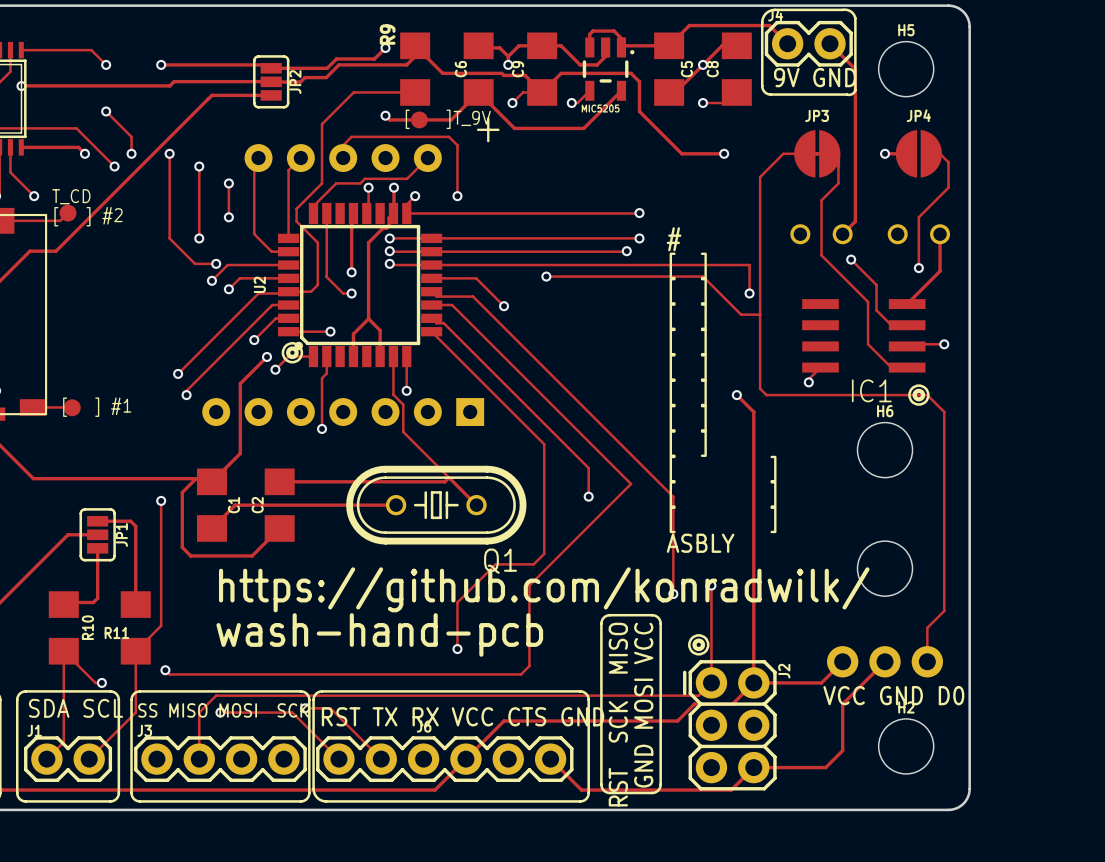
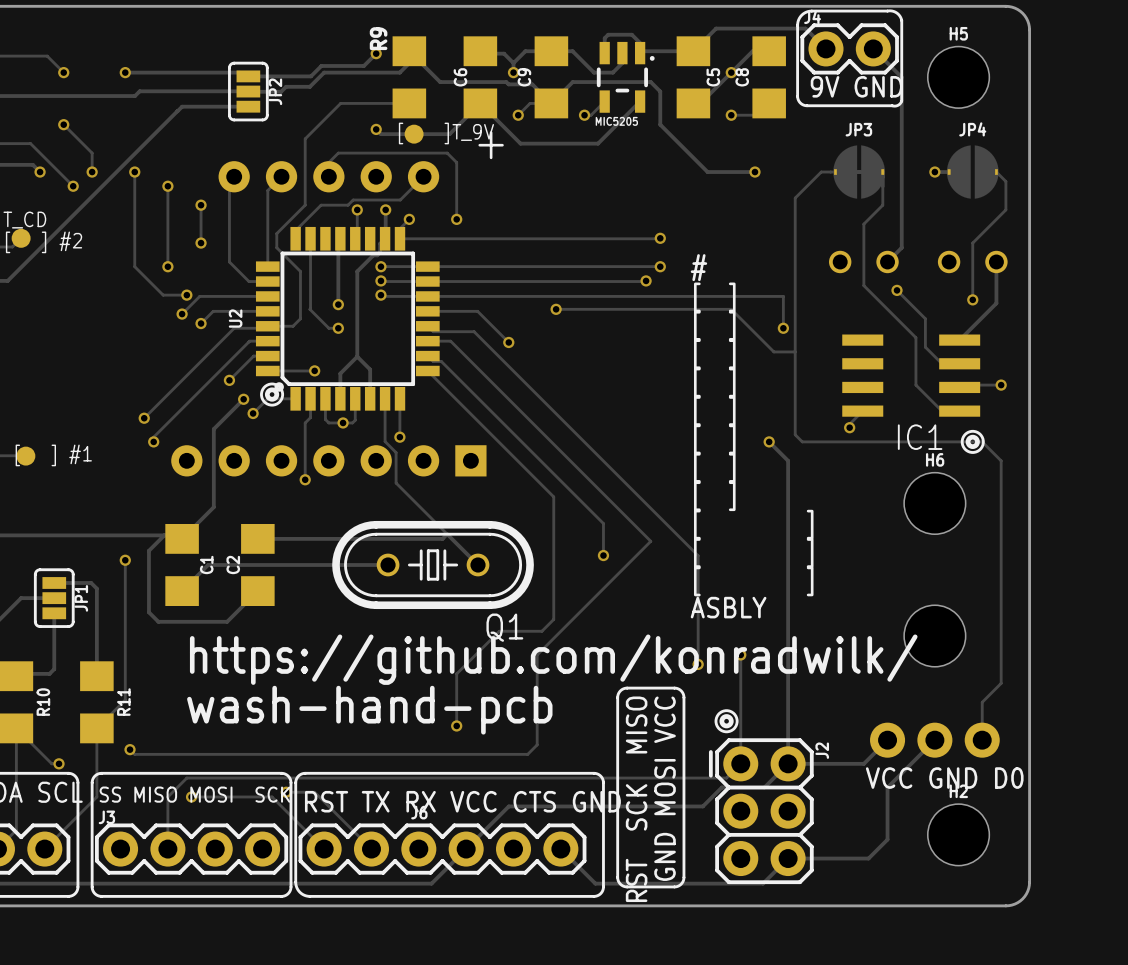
track: none -> (325, 398) (325, 419) (328, 422) (352, 422) (355, 420) (355, 398)
via: none -> (343, 422)
R11 name rotation: 0° (116, 632) -> 90° counterclockwise (123, 702)
R11 name position: R11 (116, 632) -> R11 (123, 702)

